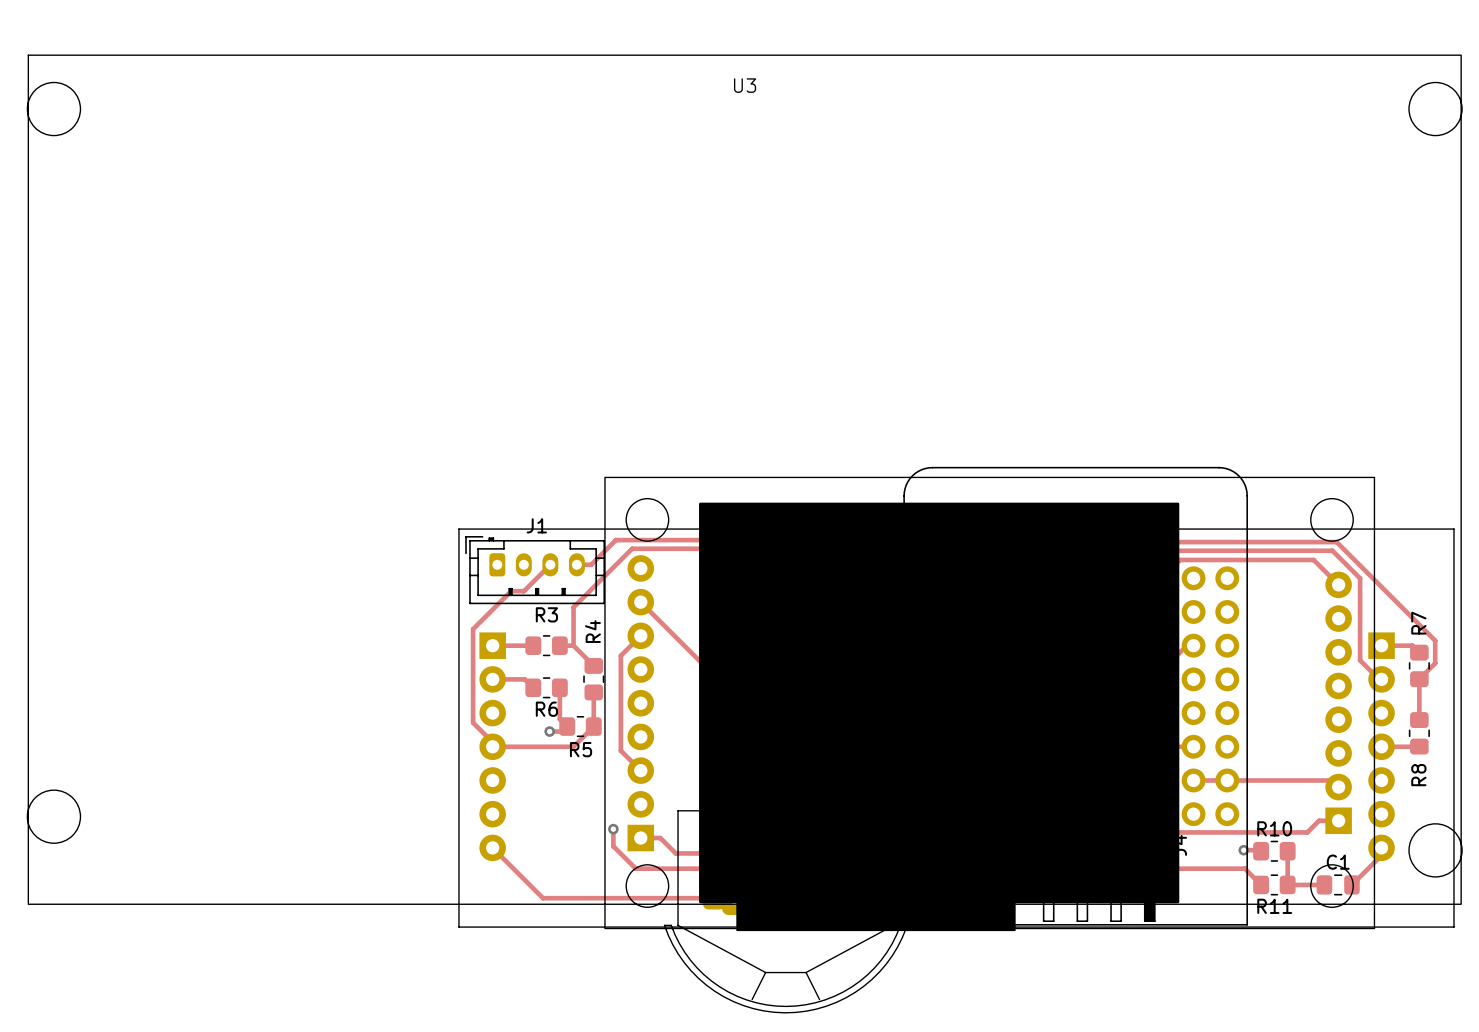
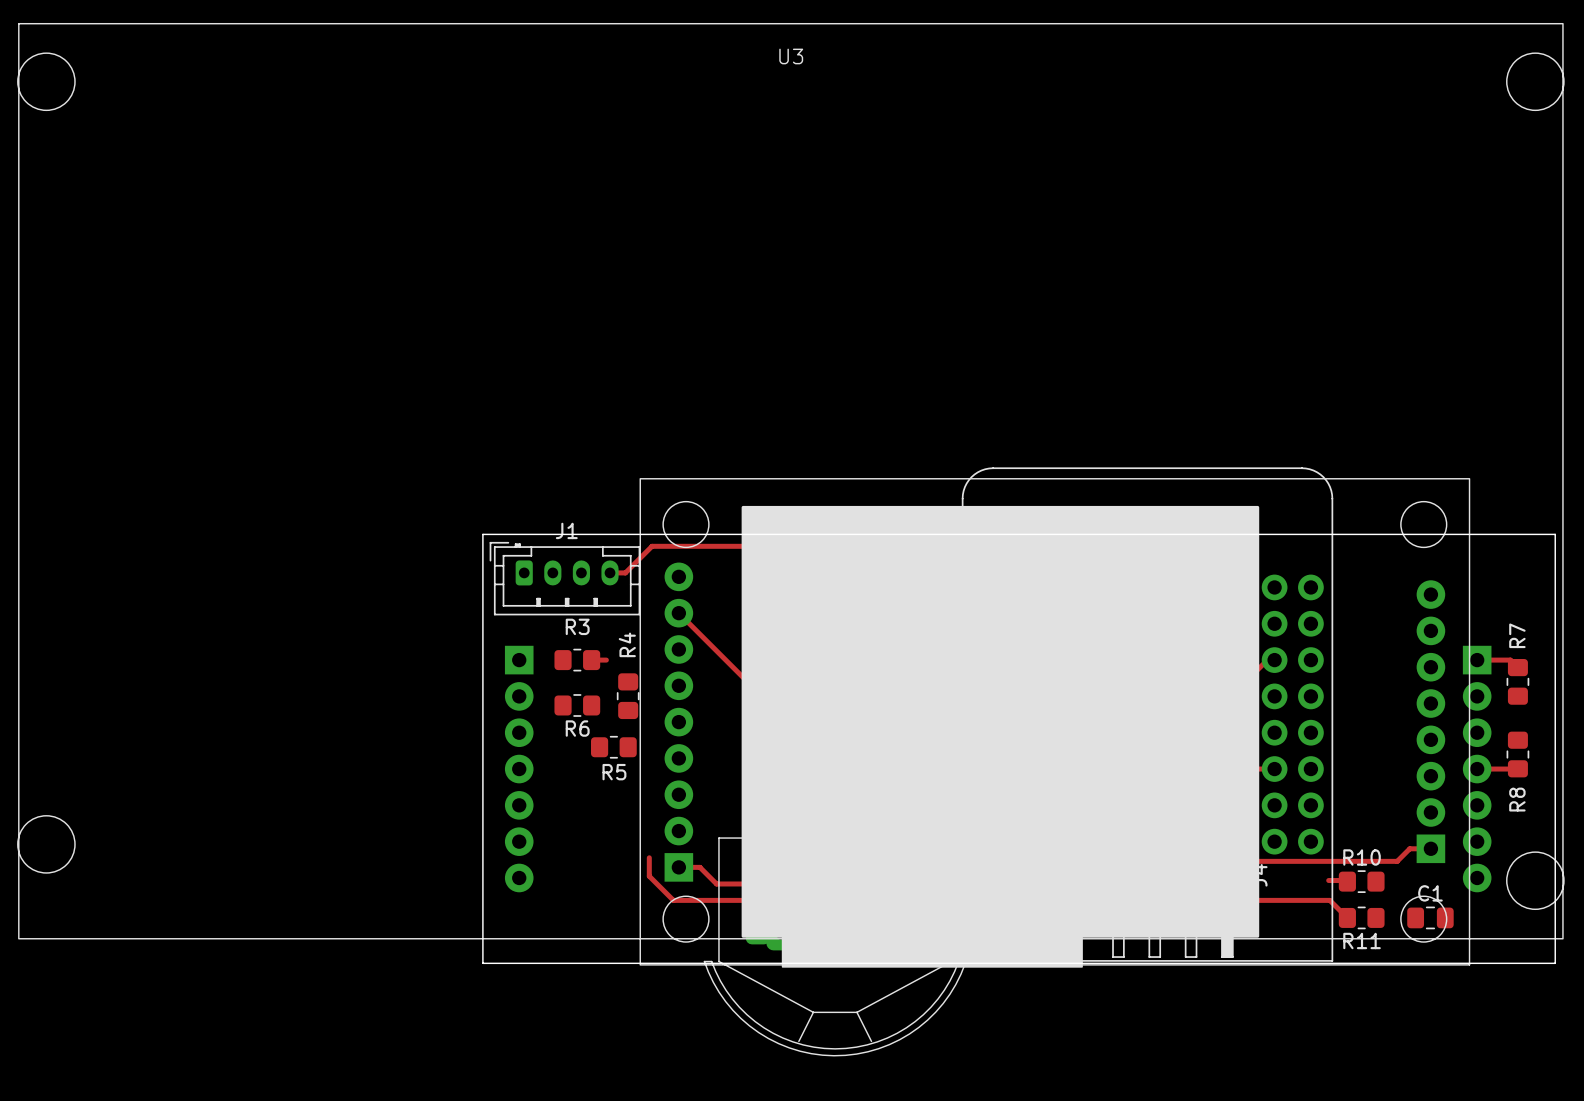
track: (550, 564) (523, 591) (511, 591) (473, 629) (473, 722) (497, 746) -> none
track: (1026, 570) (1054, 542) (1336, 542) (1435, 640) (1435, 663) (1419, 679) (1419, 720) -> none
track: (1085, 570) (1105, 550) (1332, 550) (1360, 578) (1360, 660) (1379, 679) (1381, 679) -> none
track: (1338, 584) (1313, 559) (1179, 559) (1116, 623) -> none
track: (640, 635) (620, 655) (620, 750) (640, 770) -> none
track: (492, 645) (533, 645) -> none
track: (924, 645) (827, 548) (632, 548) (573, 607) (573, 645) (593, 665) -> none
track: (492, 679) (524, 679) (533, 687) -> none
track: (559, 687) (559, 719) (567, 726) (562, 731) (549, 731) -> none
track: (593, 692) (593, 726) (573, 746) (492, 746) -> none
via: (549, 731) -> none
track: (1193, 780) (1332, 780) (1338, 787) -> none
via: (613, 829) -> none
track: (492, 847) (543, 898) (731, 898) (735, 901) -> none
track: (1381, 847) (1381, 855) (1351, 884) -> none
via: (1243, 850) -> none
track: (1287, 851) (1287, 884) (1324, 884) -> none

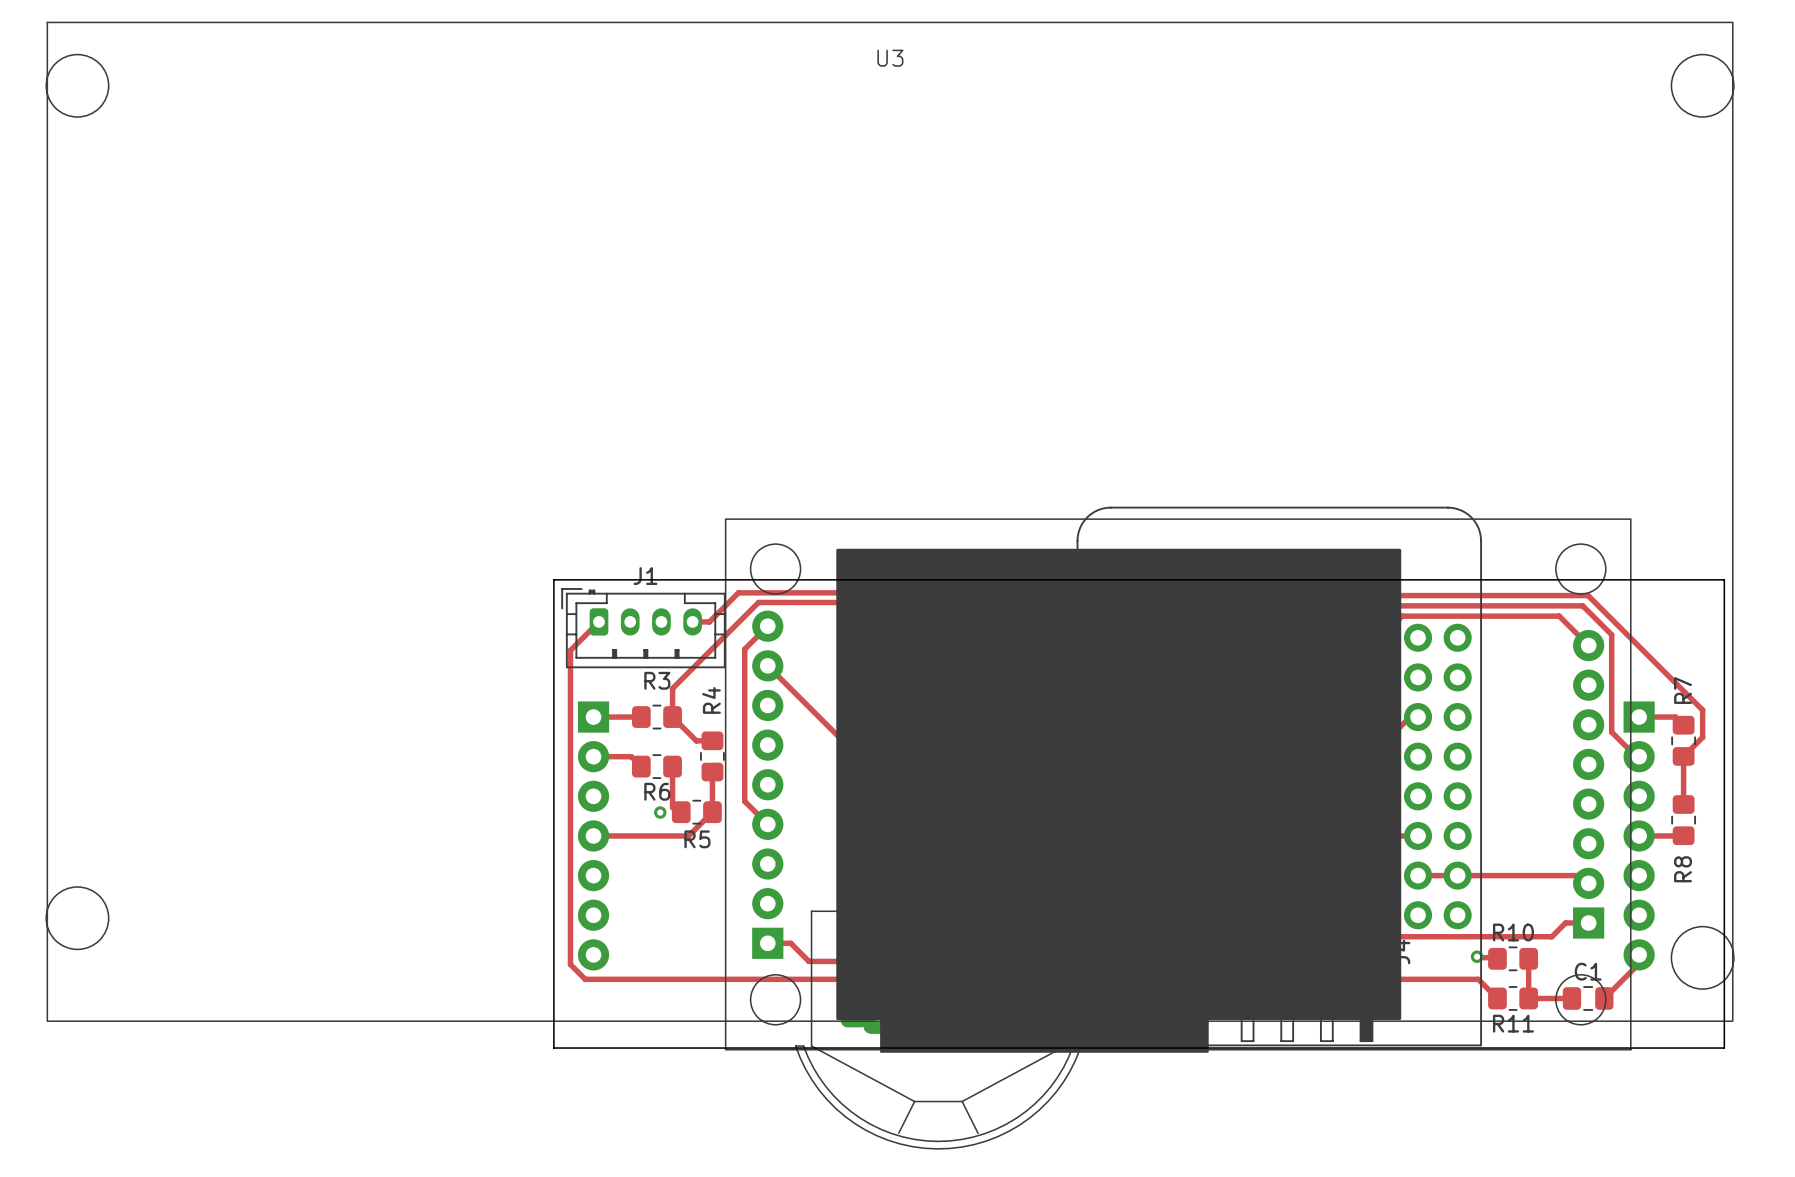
track: none -> (767, 626) (744, 649) (744, 801) (767, 824)
track: none -> (1140, 637) (1174, 637) (1216, 595) (1588, 595) (1702, 710) (1702, 737) (1683, 756) (1683, 804)
track: none -> (1588, 645) (1559, 616) (1402, 616) (1326, 691)
track: none -> (1140, 677) (1215, 677) (1287, 605) (1582, 605) (1611, 634) (1611, 732) (1636, 756) (1639, 756)
track: none -> (593, 717) (641, 717)
track: (591, 660) (606, 660) -> none
track: none -> (1100, 717) (986, 602) (758, 602) (672, 688) (672, 717) (696, 740) (712, 740)
track: none -> (593, 756) (631, 756) (641, 766)
track: none -> (672, 766) (672, 807)
track: none -> (712, 772) (712, 812) (688, 835) (593, 835)
via: none -> (660, 812)
track: none -> (1418, 875) (1580, 875) (1588, 883)
track: (649, 857) (649, 876) (673, 900) -> (599, 621) (570, 650) (570, 964) (585, 979) (761, 979)
track: none -> (1639, 954) (1639, 963) (1604, 998)
via: none -> (1477, 956)
track: none -> (1528, 958) (1528, 998) (1571, 998)

